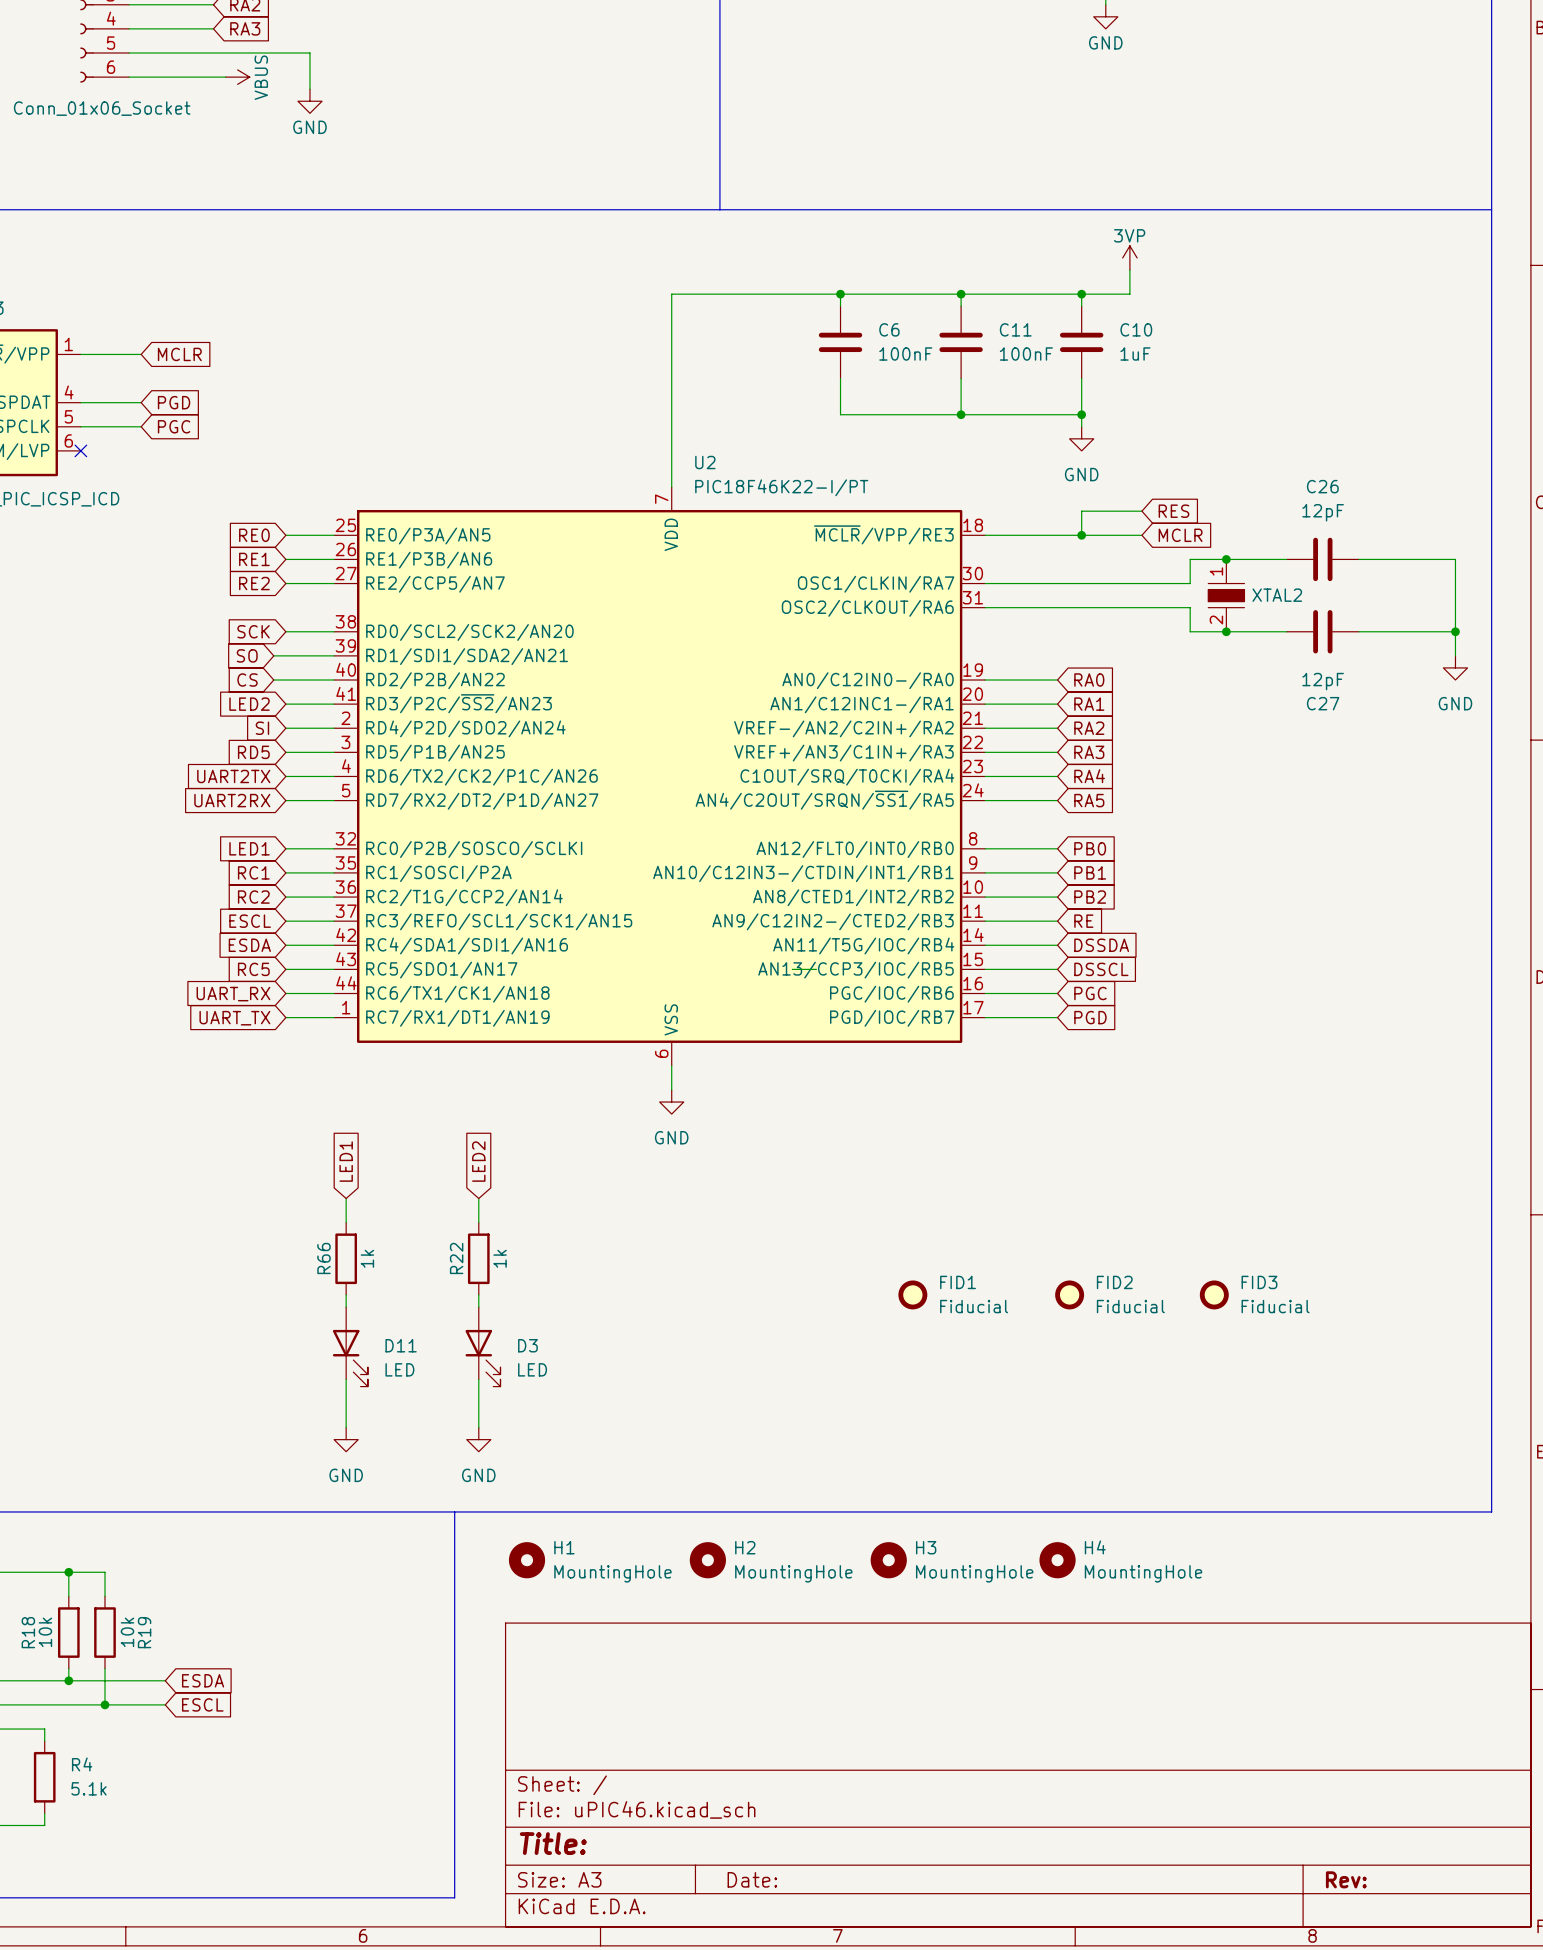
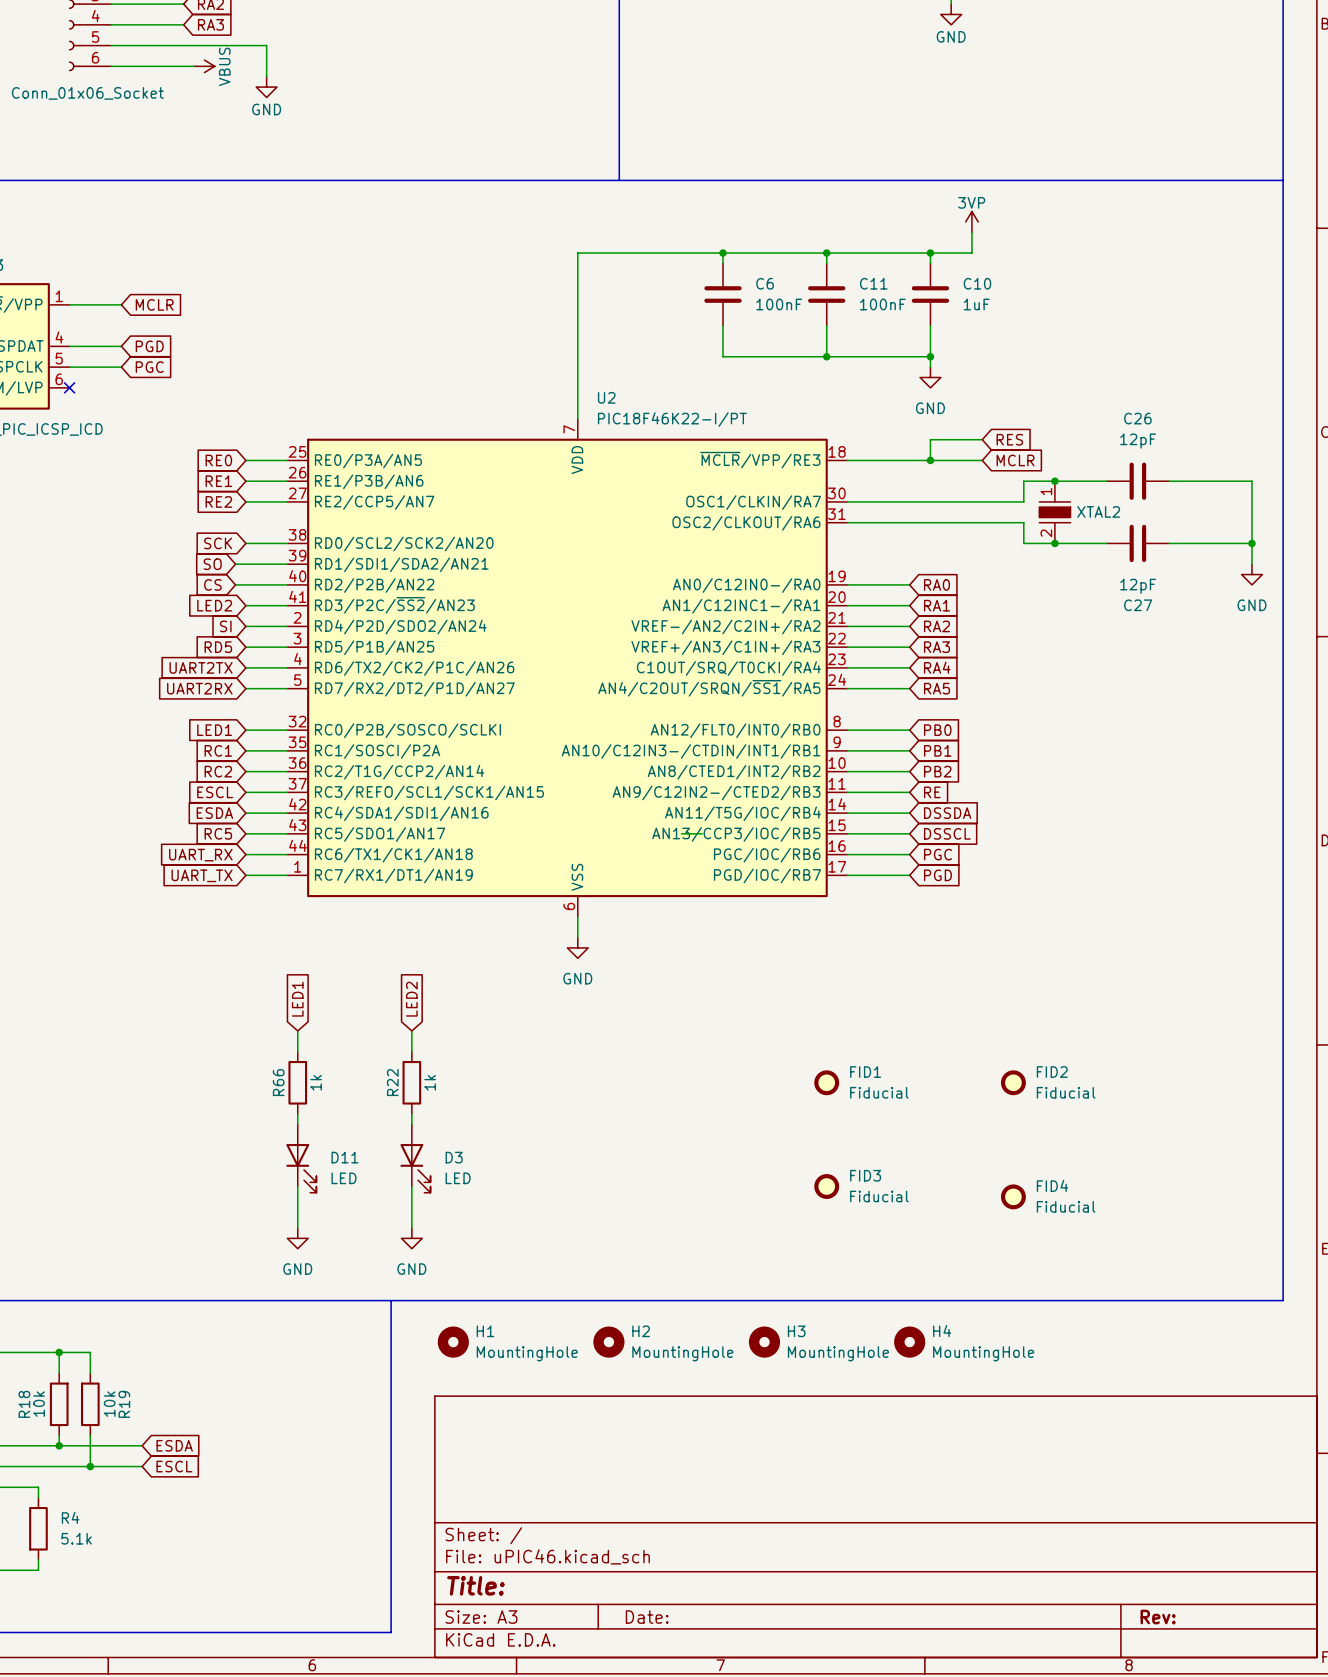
FID1 position: (912, 1294) -> (826, 1082)
FID2 position: (1069, 1294) -> (1013, 1082)
FID3 position: (1214, 1294) -> (826, 1186)
FID4: none -> Fiducial (1013, 1196)

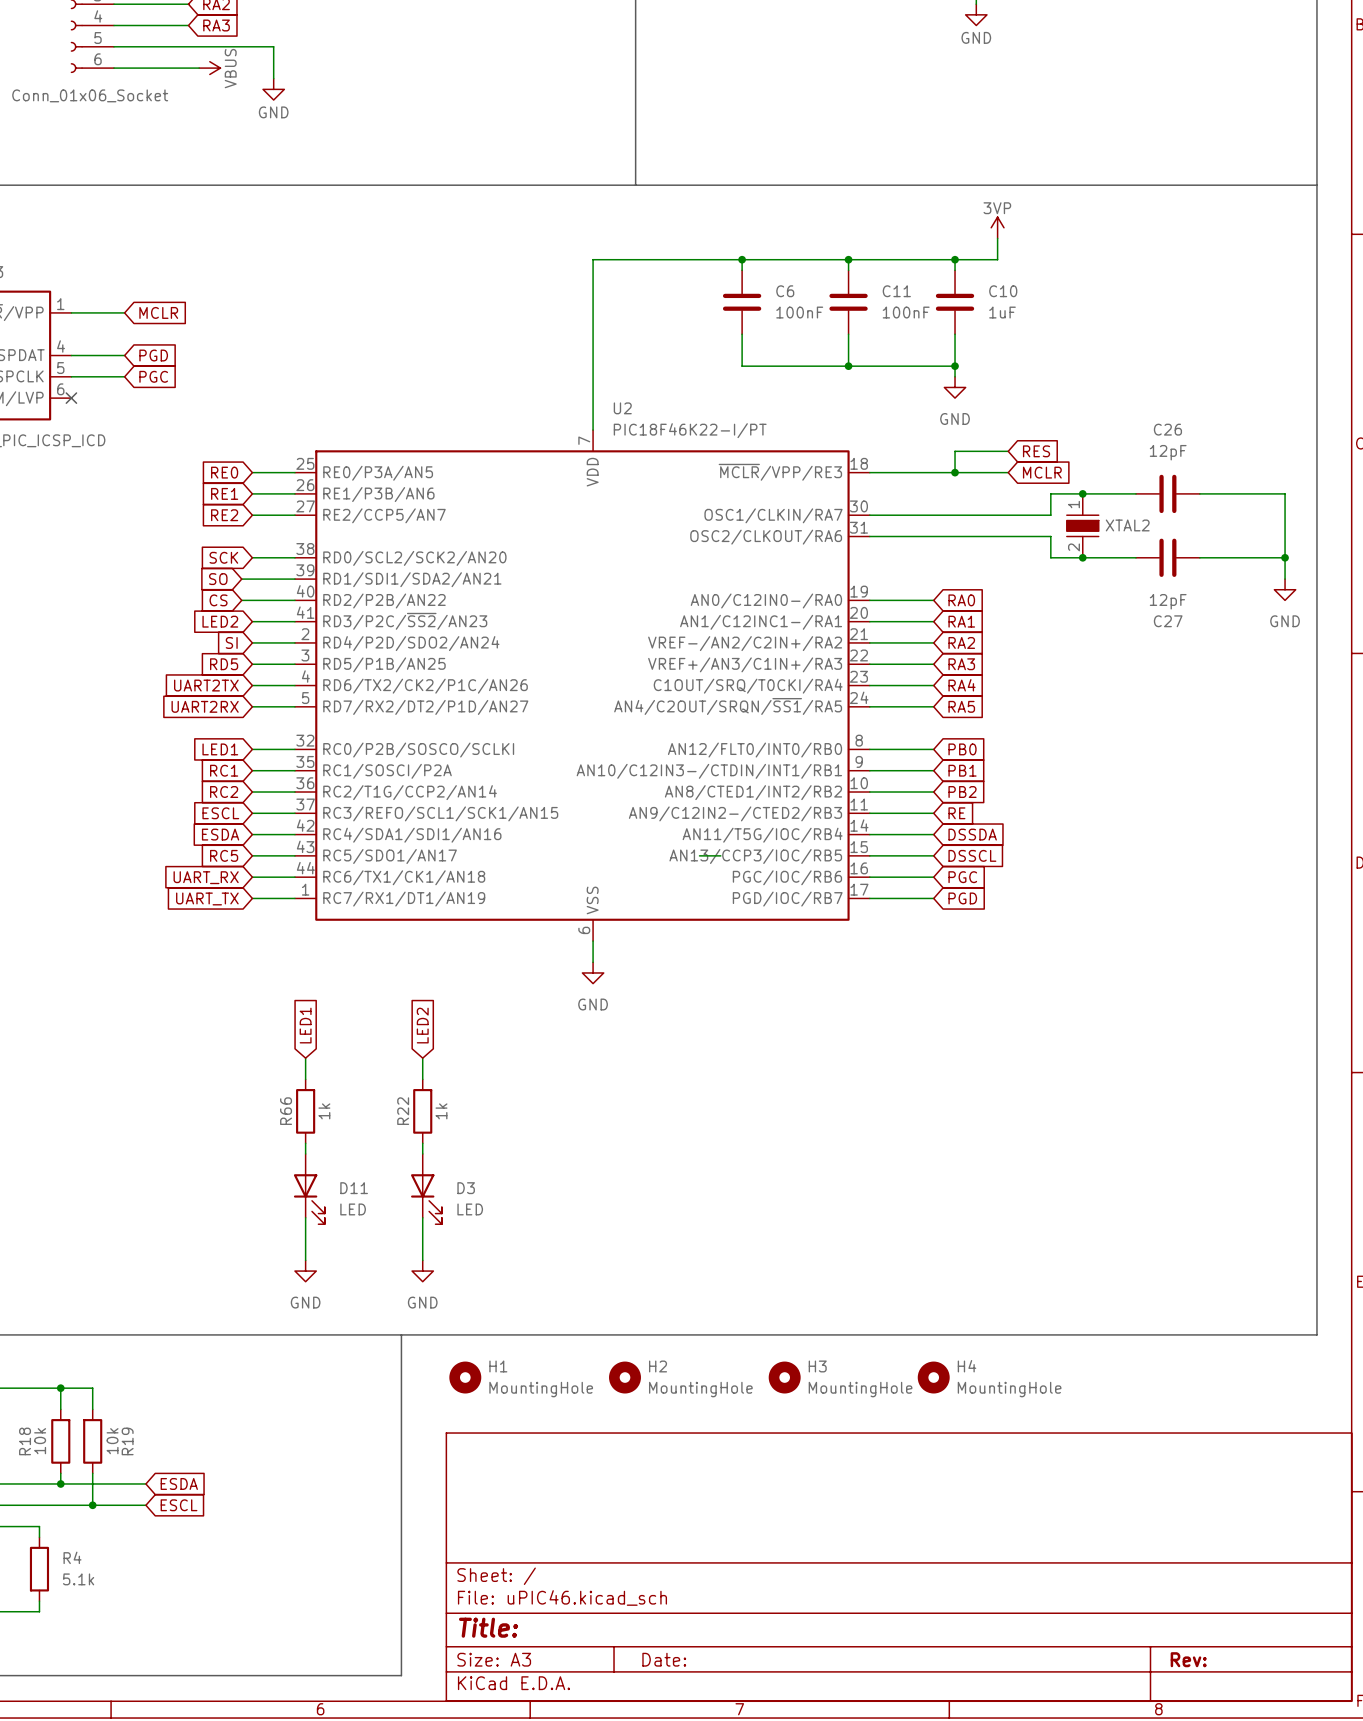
FID1: Fiducial (826, 1082) -> none
FID2: Fiducial (1013, 1082) -> none
FID3: Fiducial (826, 1186) -> none
FID4: Fiducial (1013, 1196) -> none

